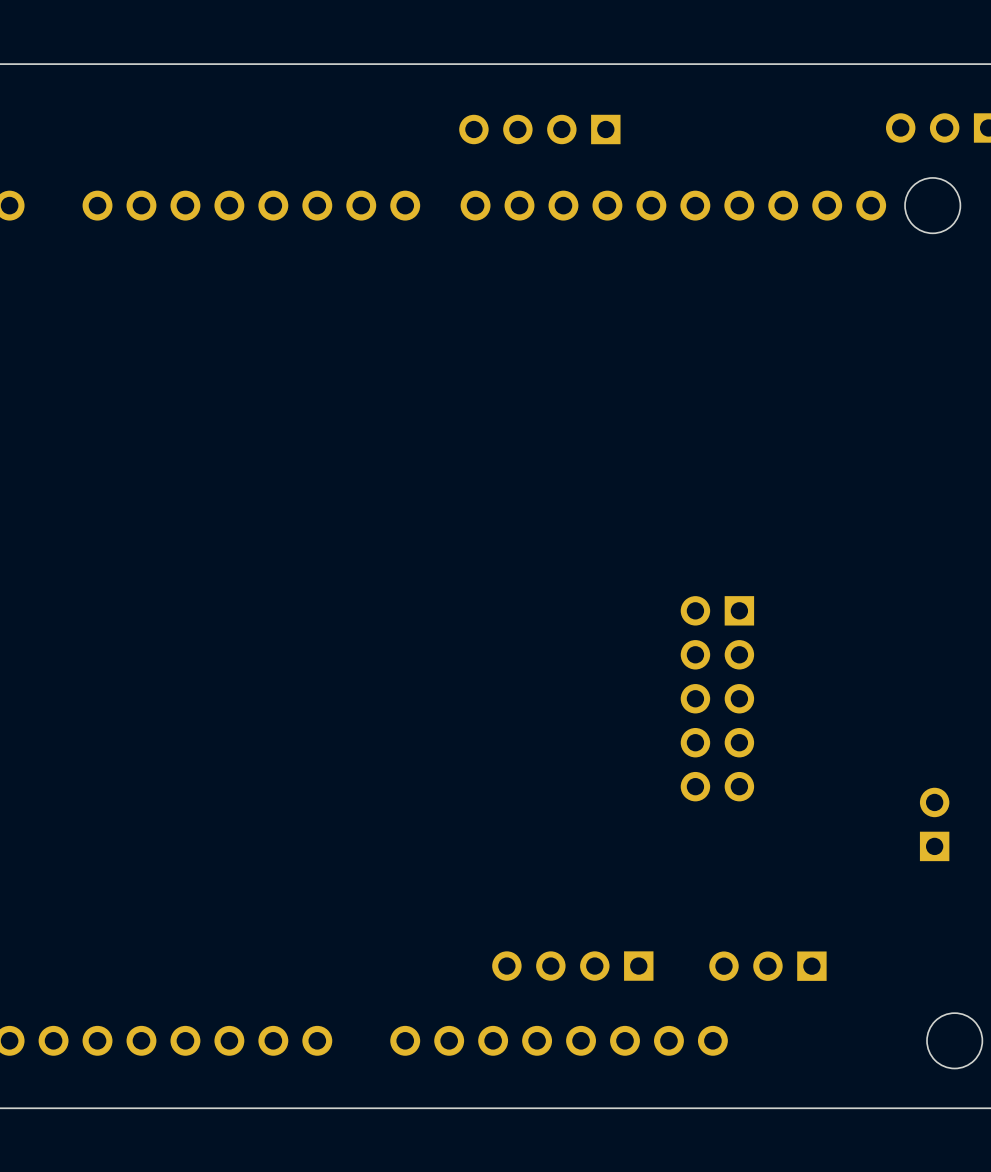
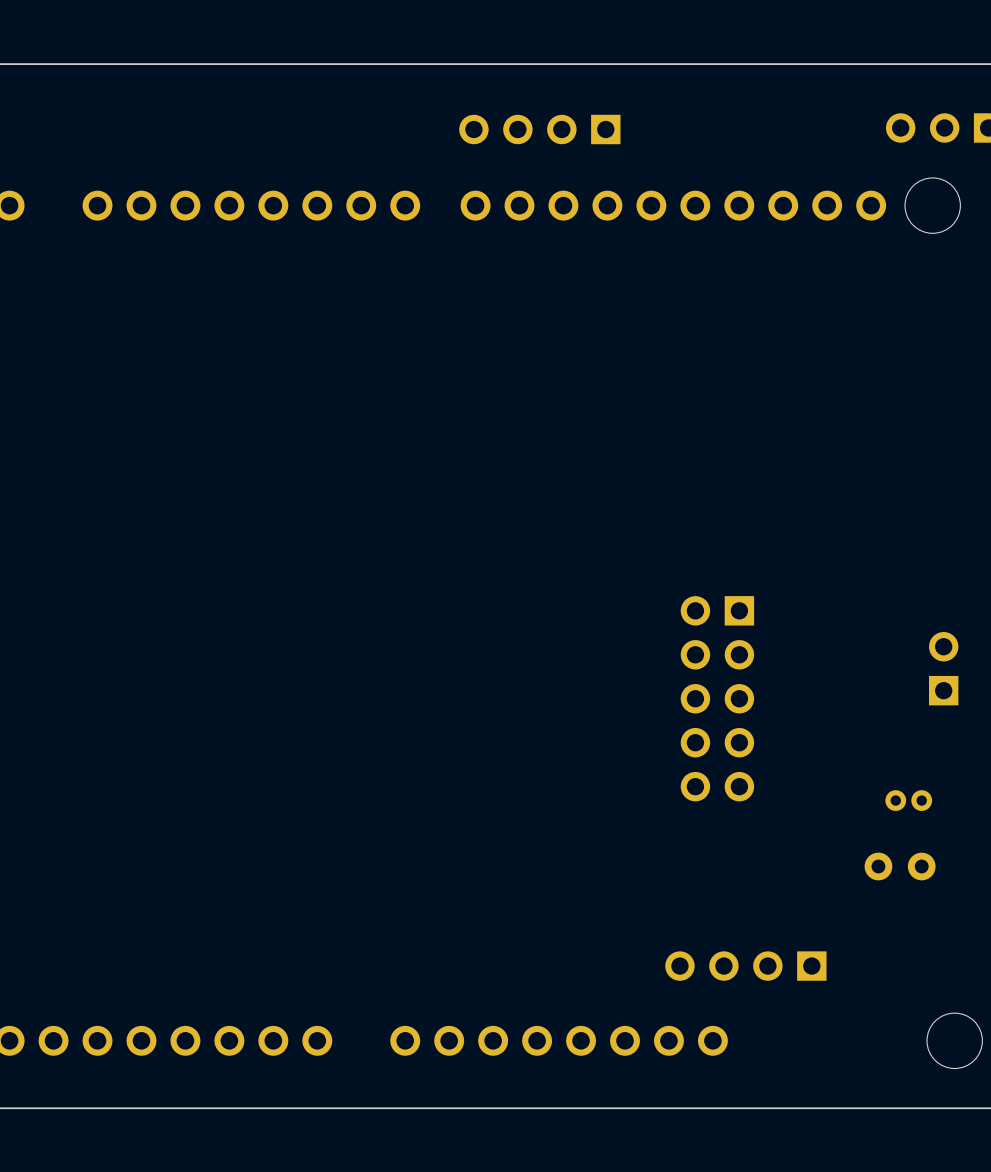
part: none -> (908, 800)
part position: (934, 824) -> (943, 668)
part: none -> (900, 866)
part position: (572, 966) -> (745, 966)
part: (767, 966) -> none

